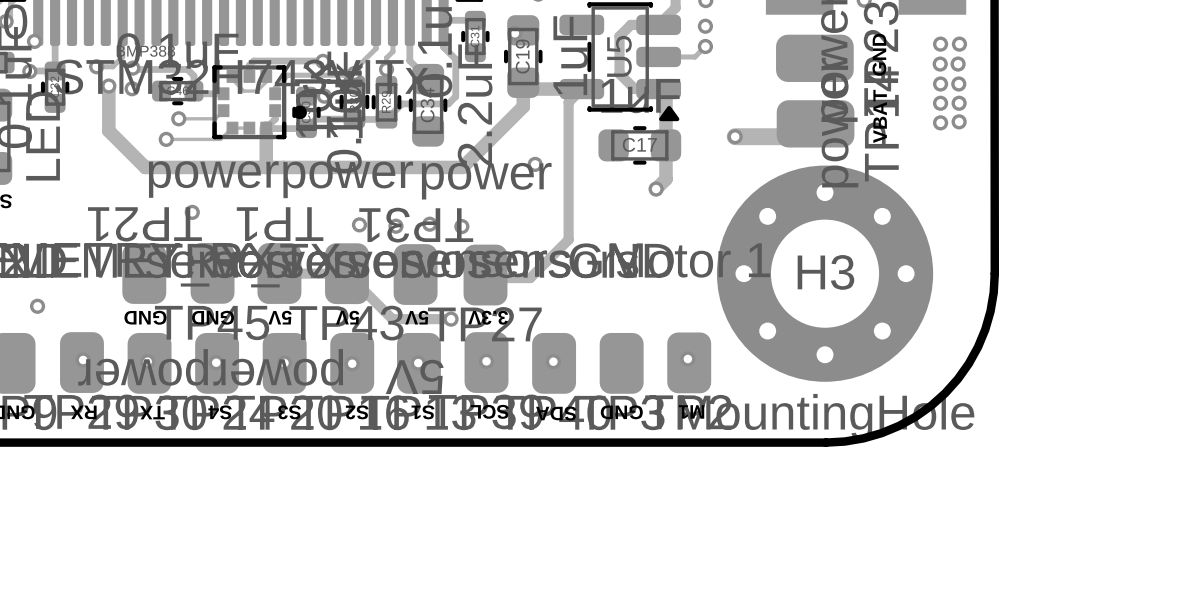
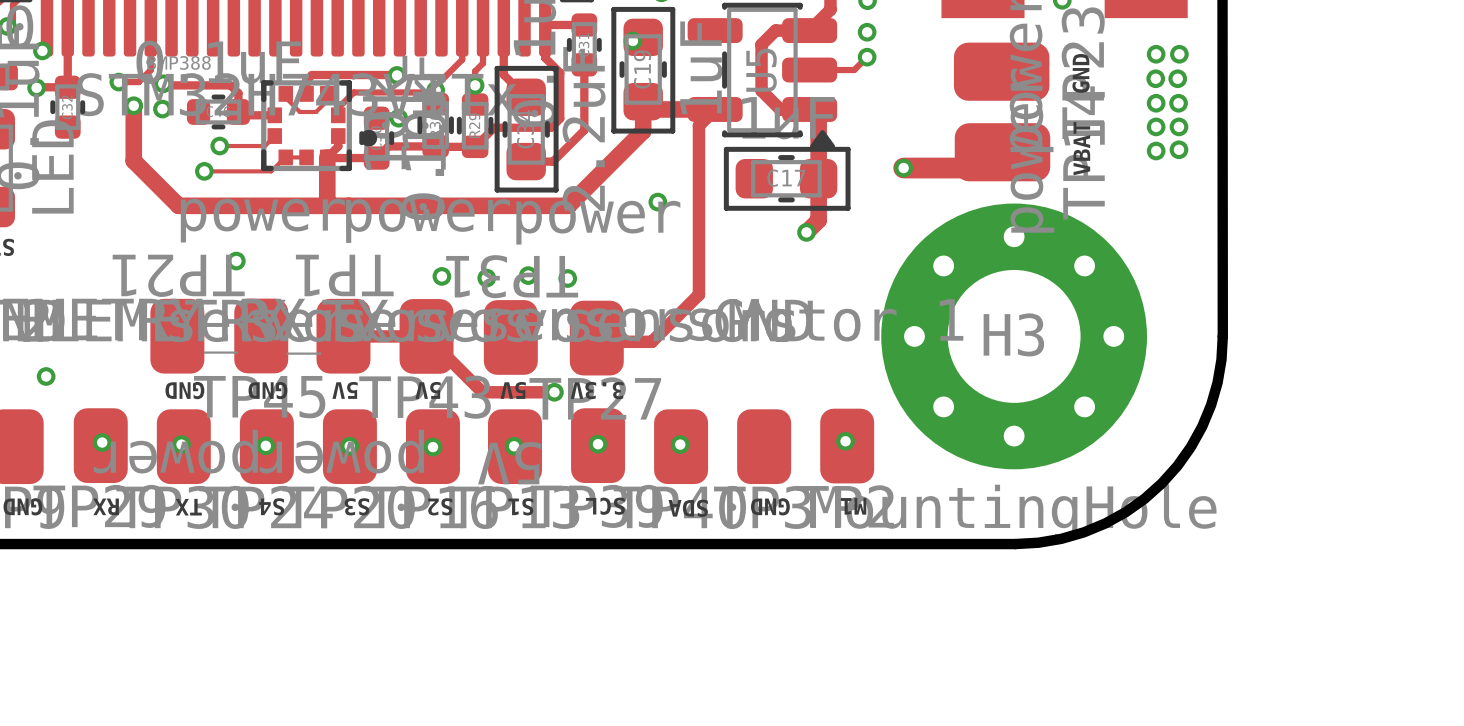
line: none -> (613, 9) (613, 131) (672, 131) (672, 9) (613, 9)
track: none -> (584, 64) (584, 130) (552, 161) (526, 161)
line: none -> (497, 68) (556, 68) (556, 190) (497, 190) (497, 68)
line: none -> (726, 149) (848, 149) (848, 208) (726, 208) (726, 149)

